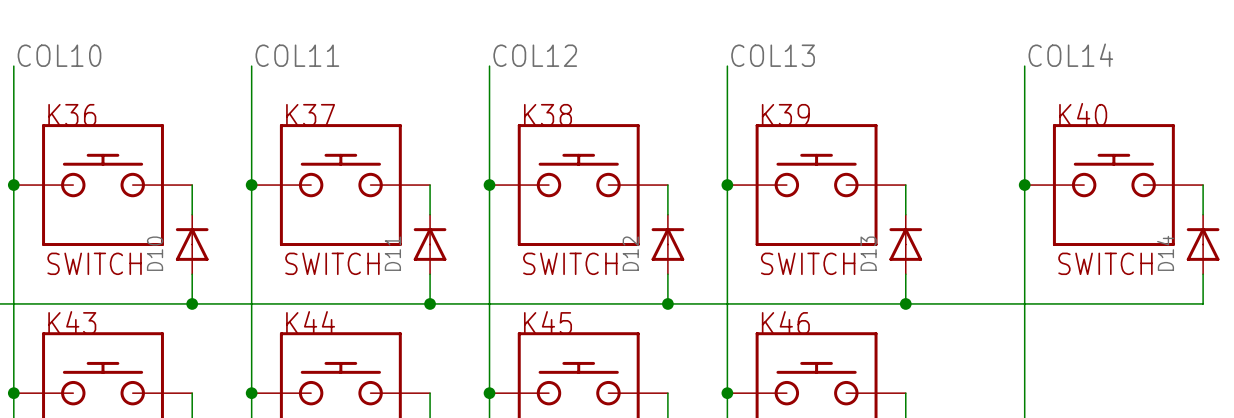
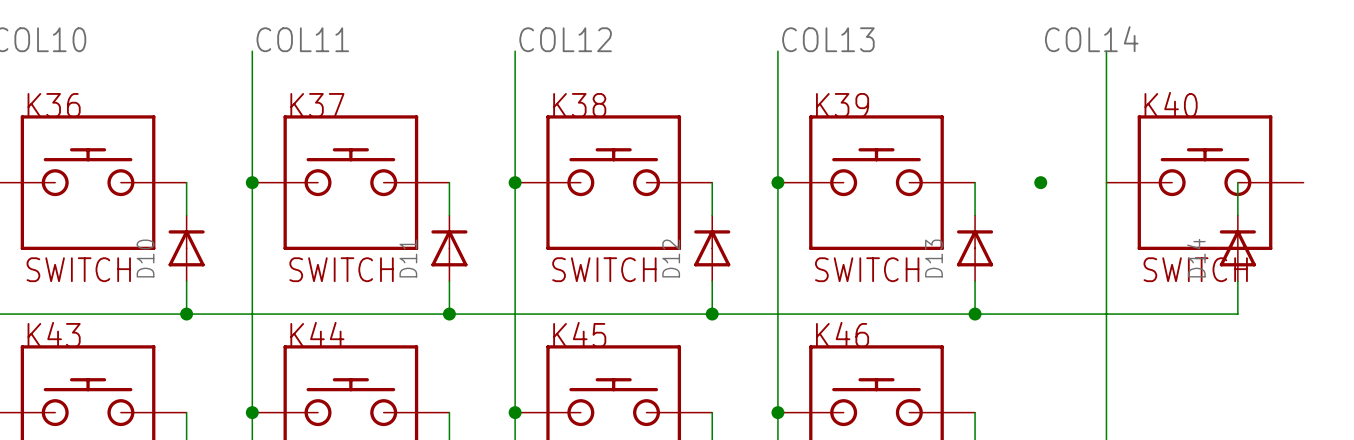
label position: COL14 (1070, 55) -> COL14 (1091, 39)
junction position: (1024, 185) -> (1040, 182)
wire: (1203, 185) (1203, 214) -> (1237, 182) (1237, 215)
D14 position: (1203, 244) -> (1237, 248)
wire: (1203, 274) (1203, 303) (1143, 303) -> (1237, 281) (1237, 314)

